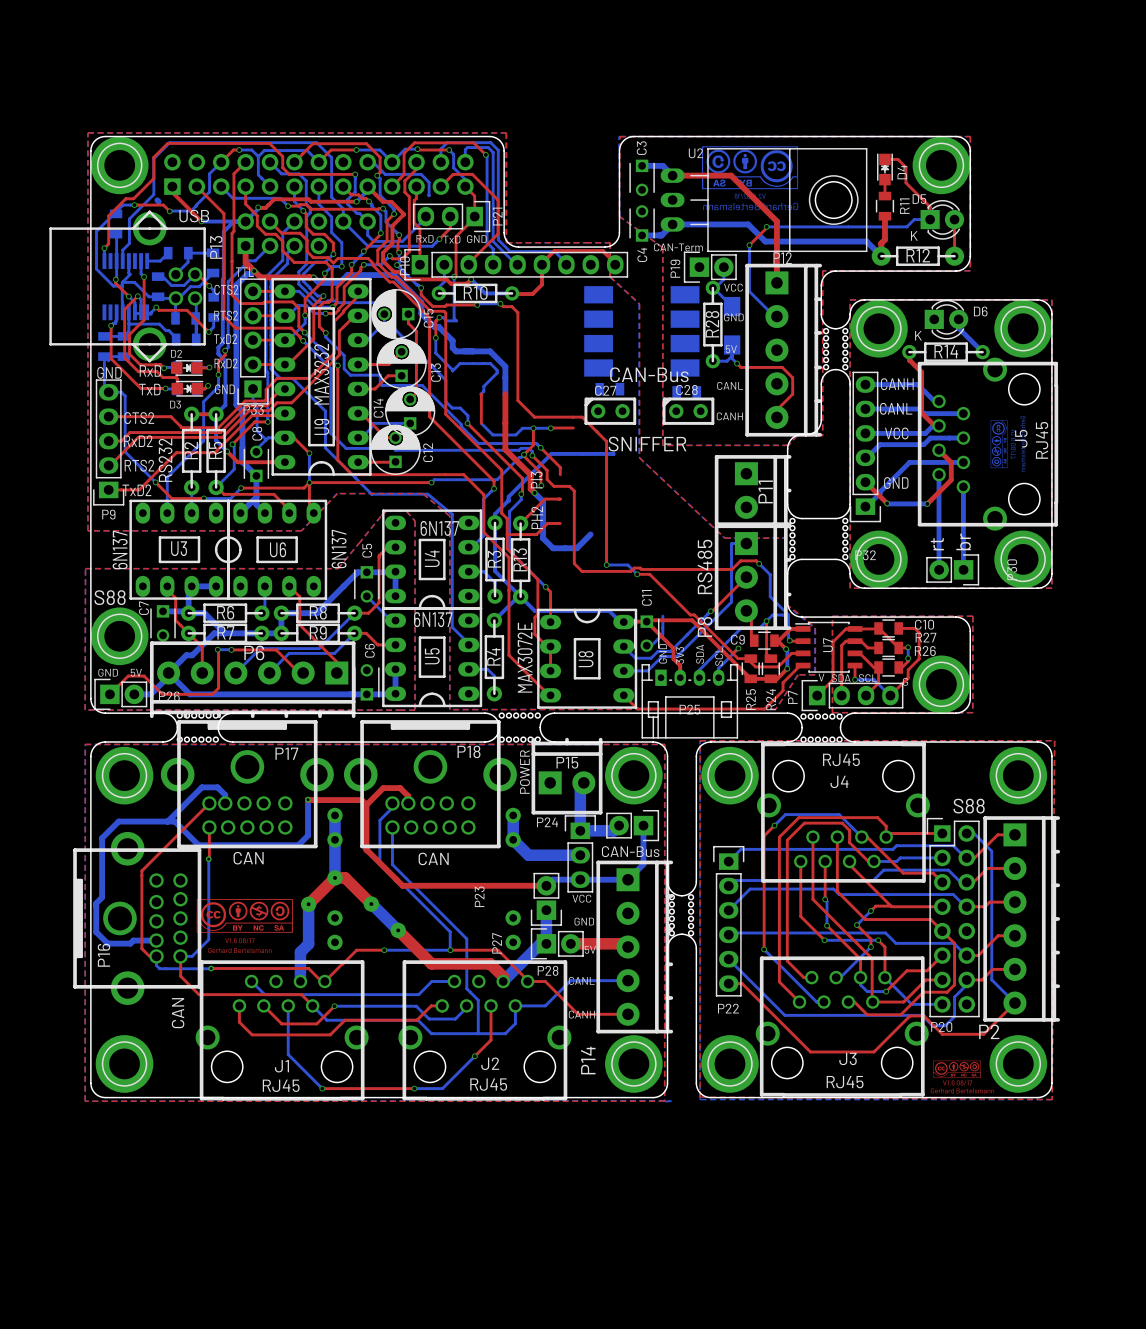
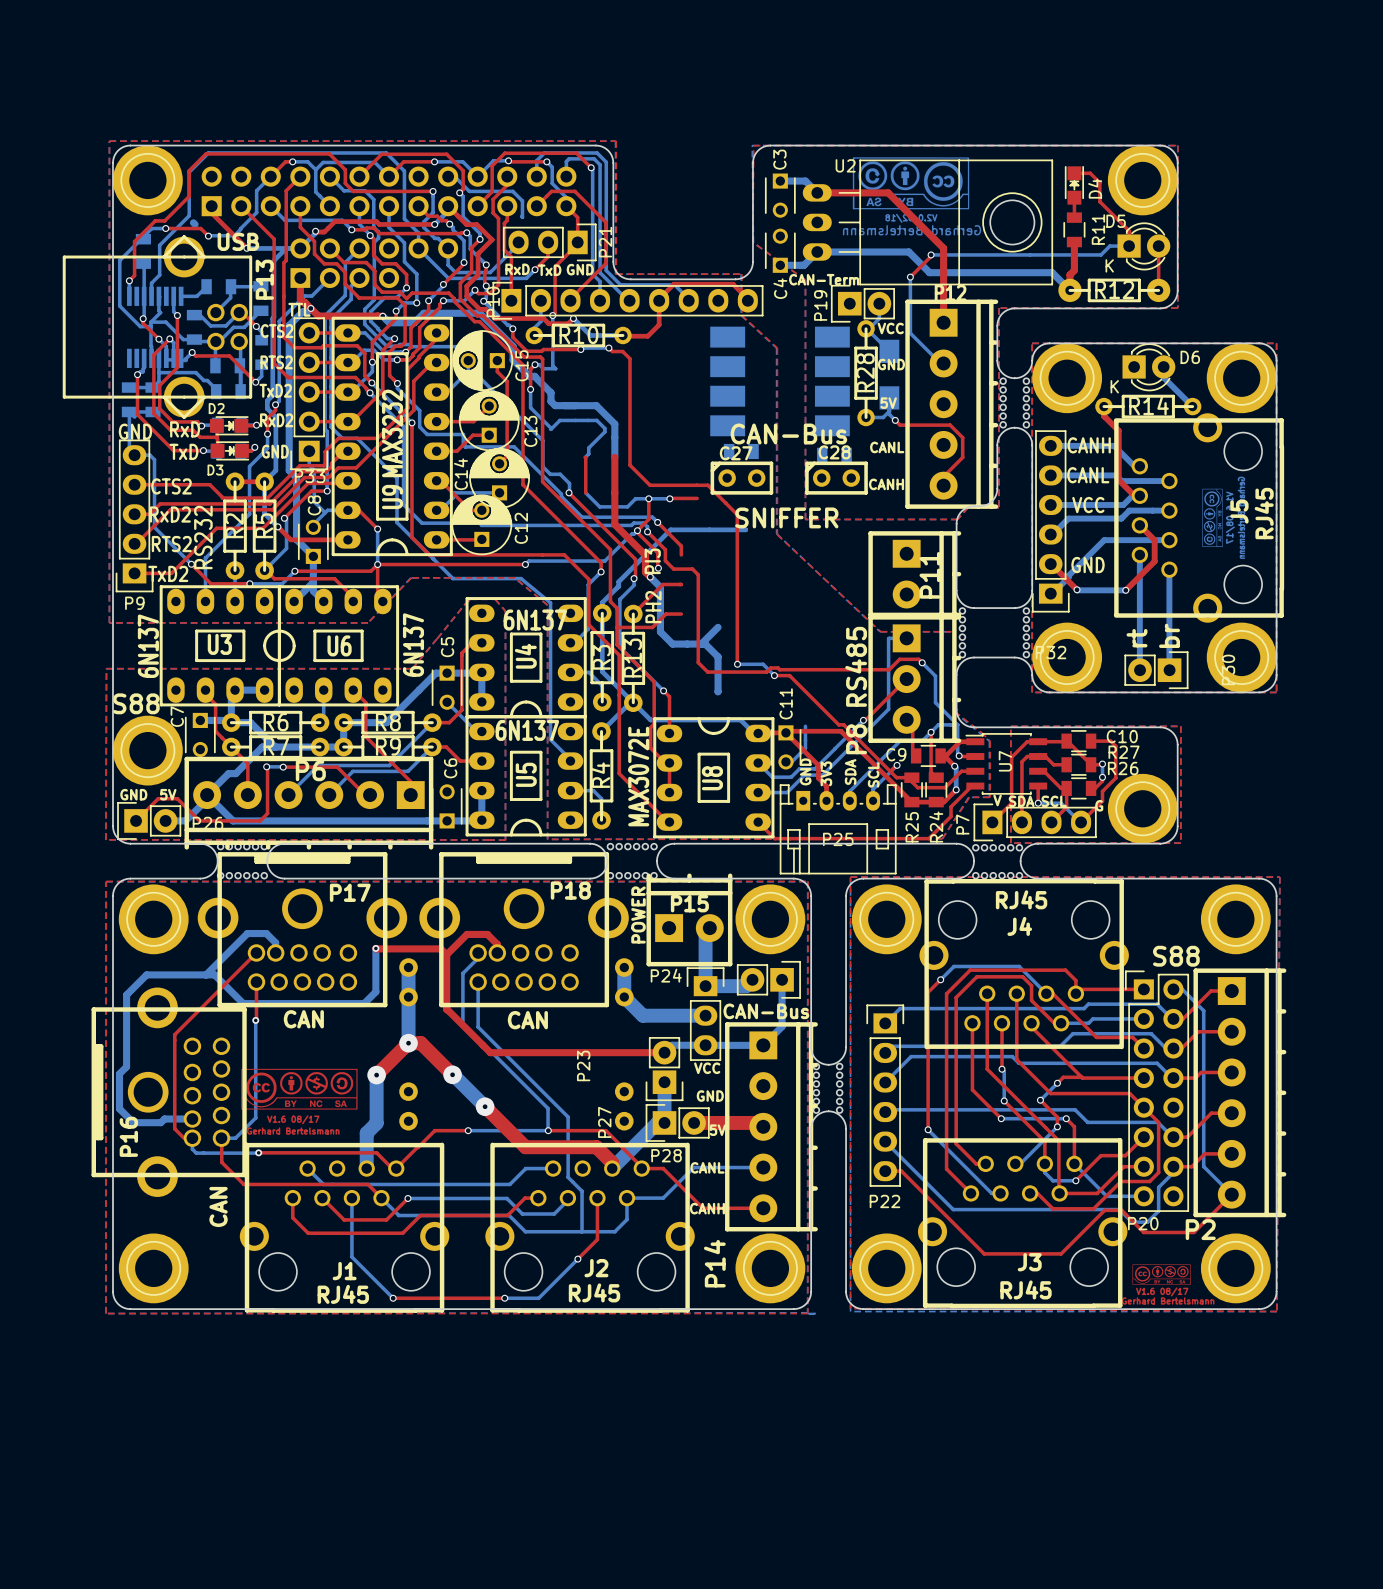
bottom track: none -> (701, 644) (705, 644) (718, 656) (718, 691)

